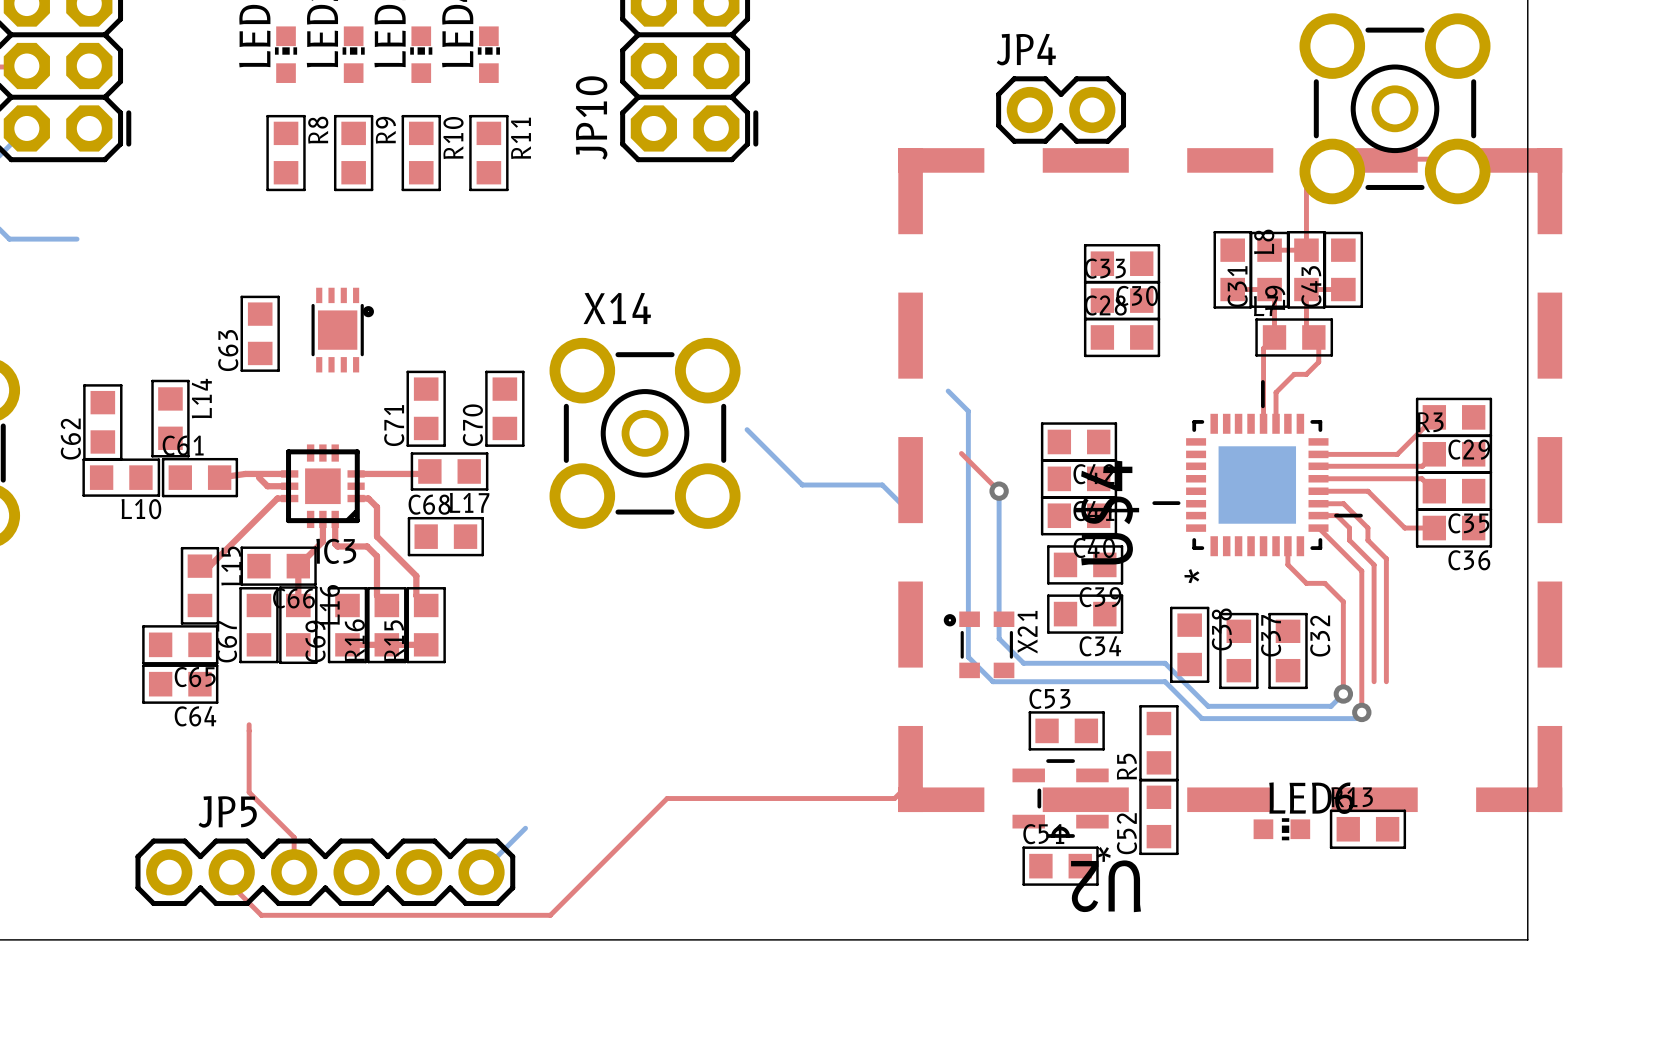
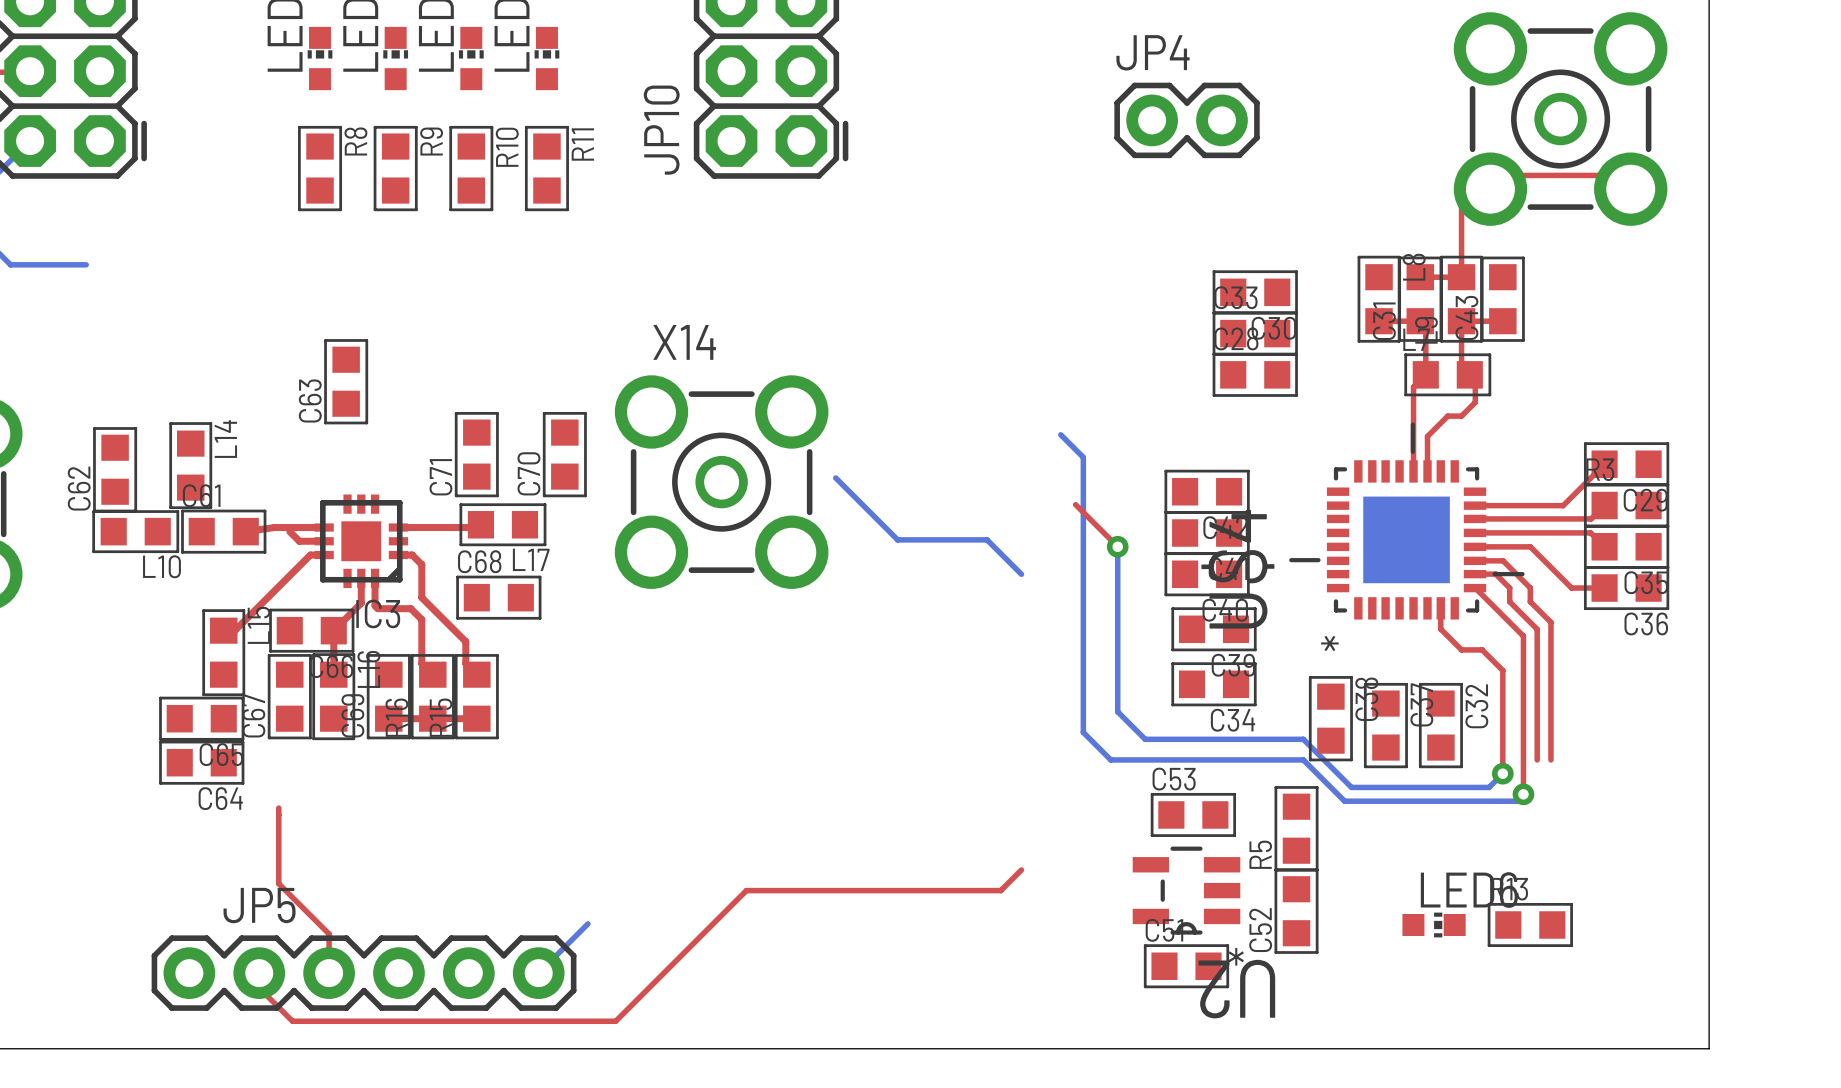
part: (342, 330) -> none
C63 position: (260, 333) -> (346, 381)
part: (1230, 480) -> none
X21: (979, 644) -> none

